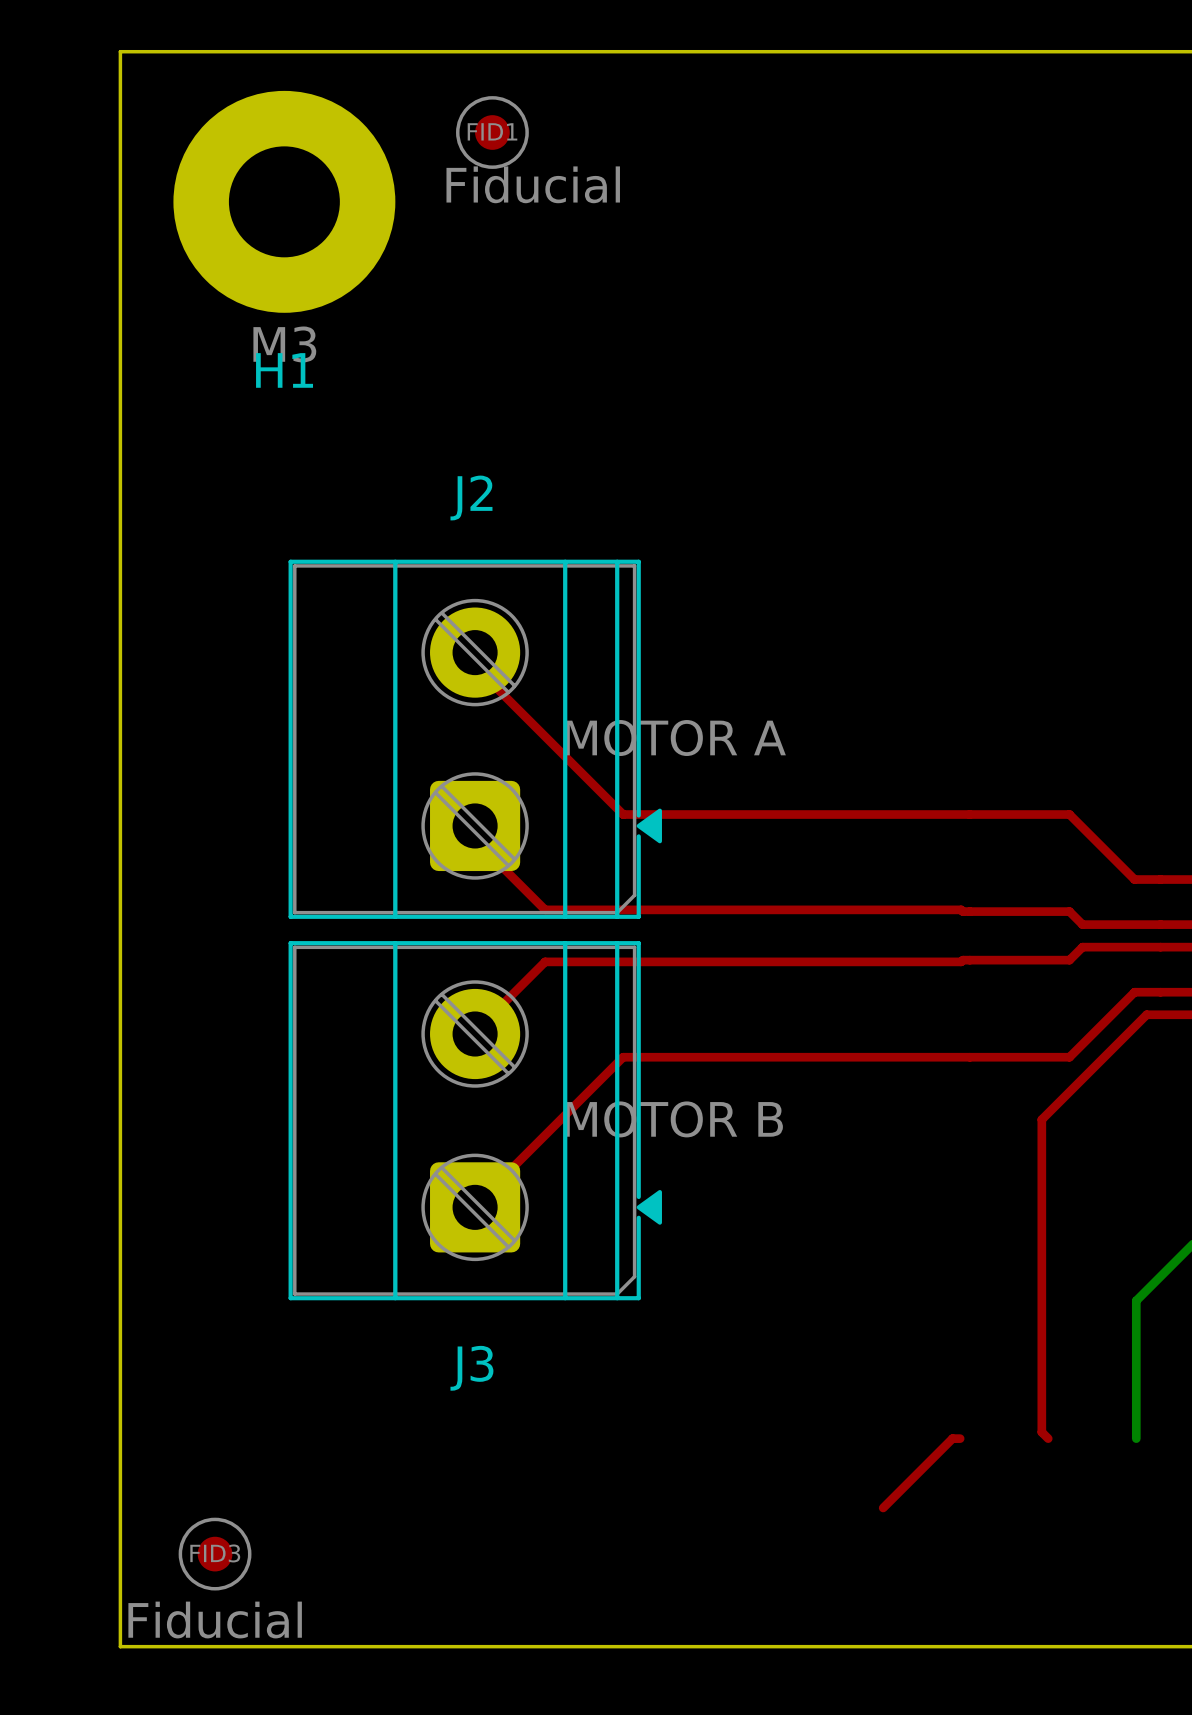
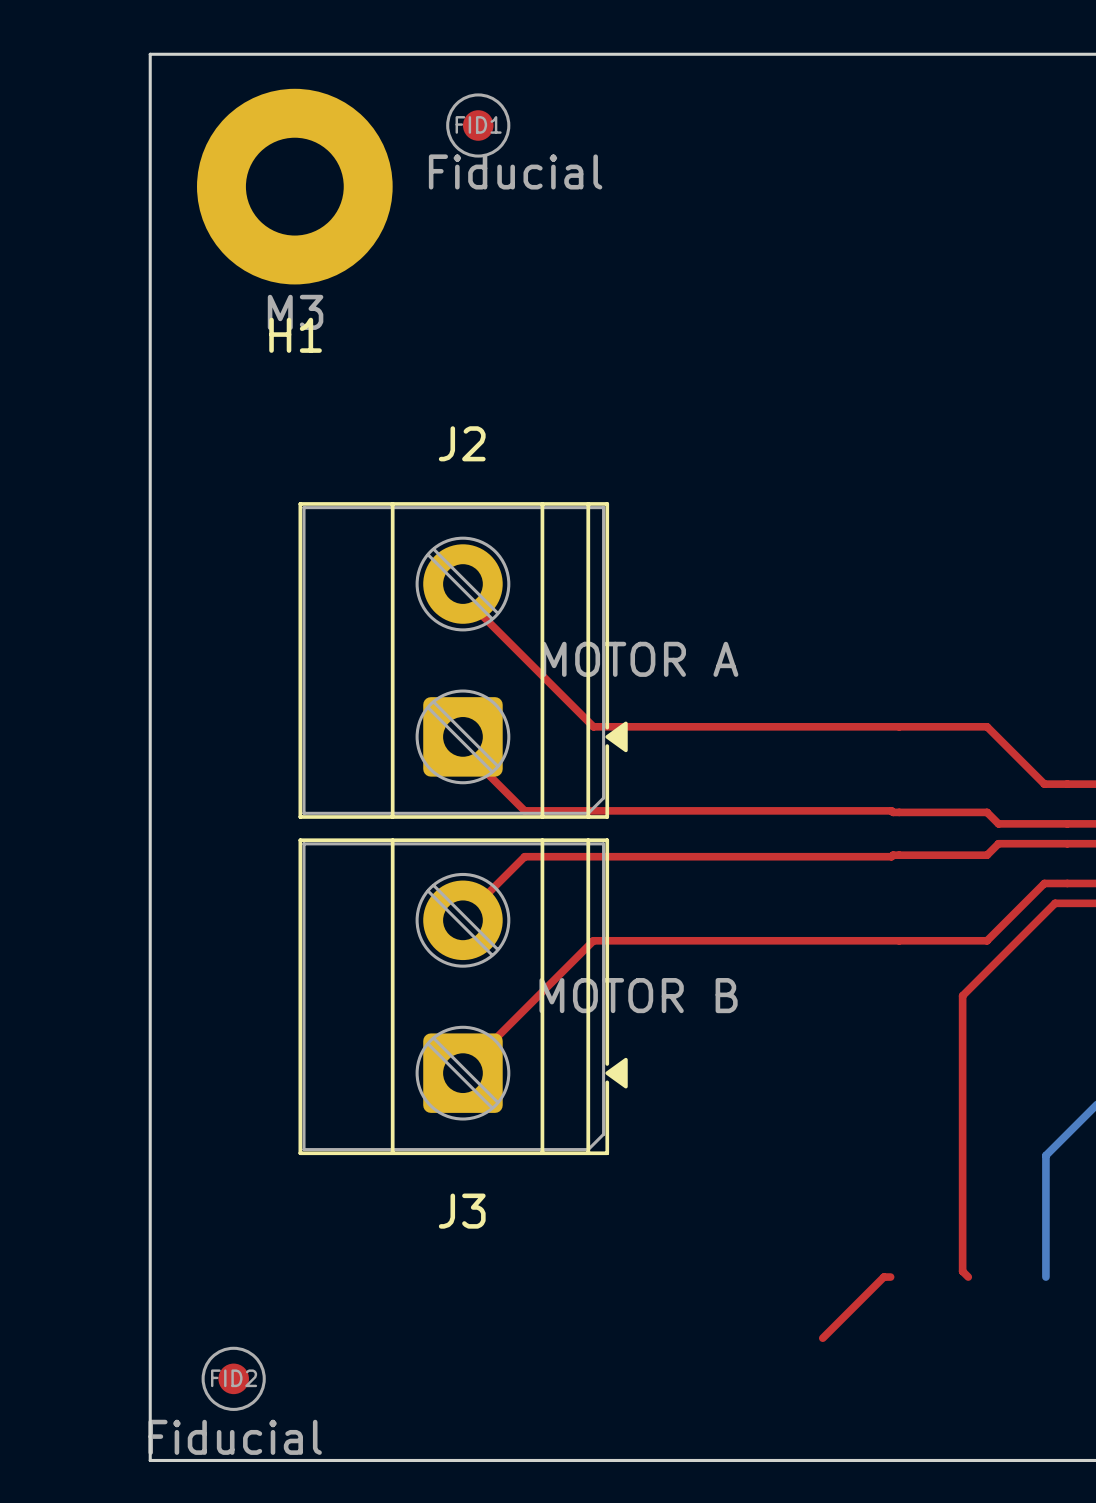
FID3 name: FID3 (215, 1553) -> FID2 (234, 1378)

